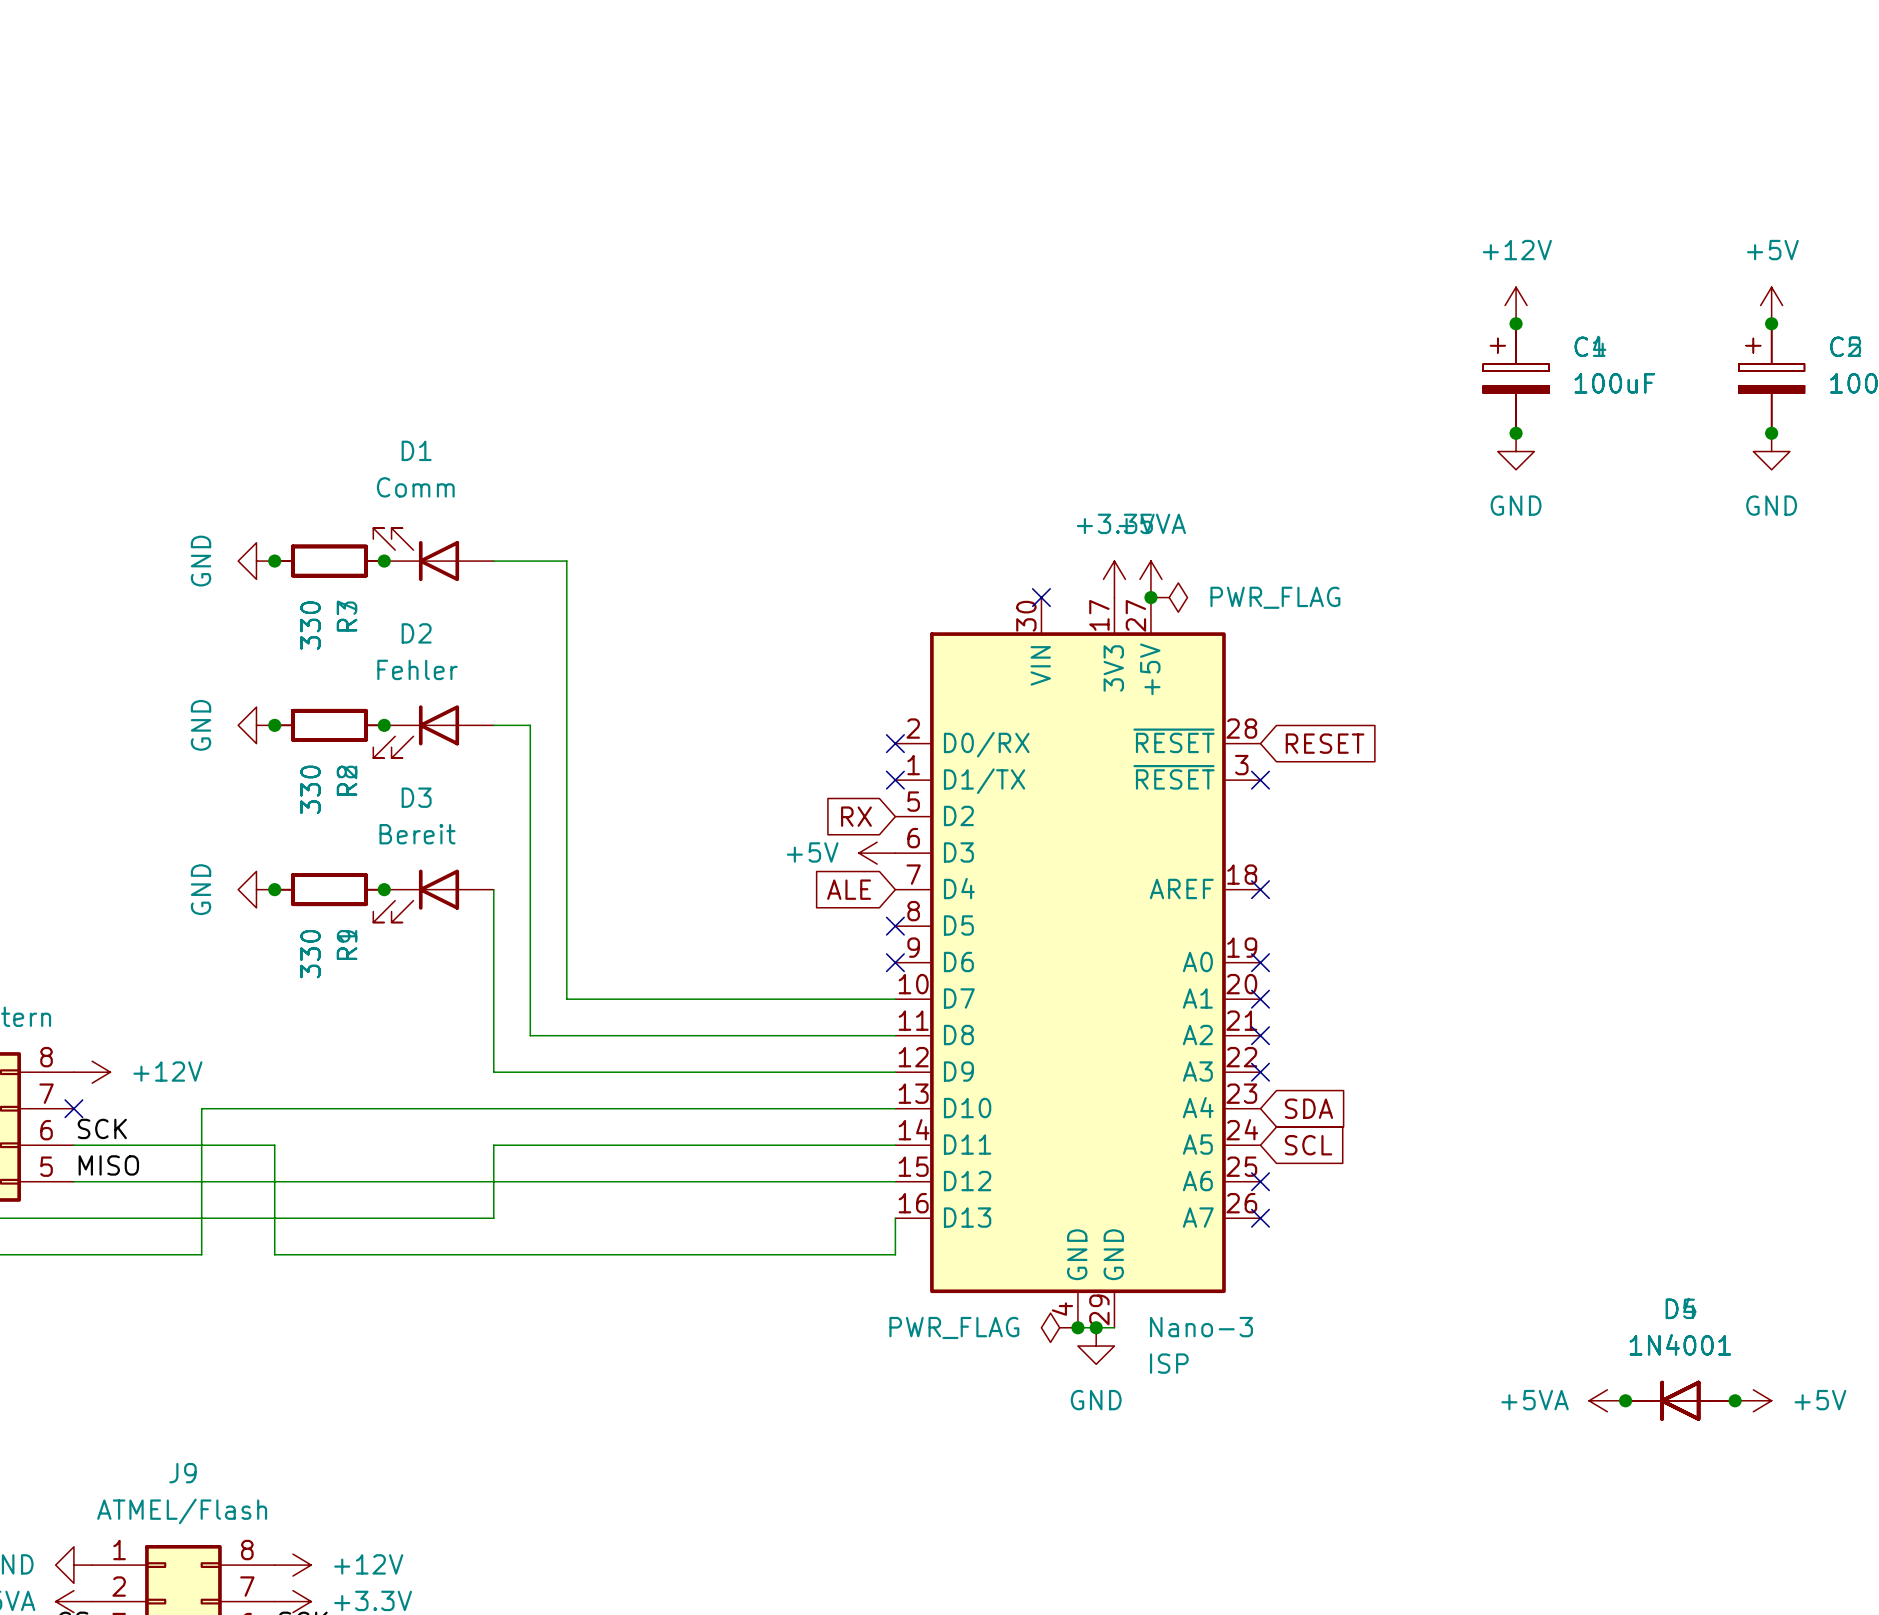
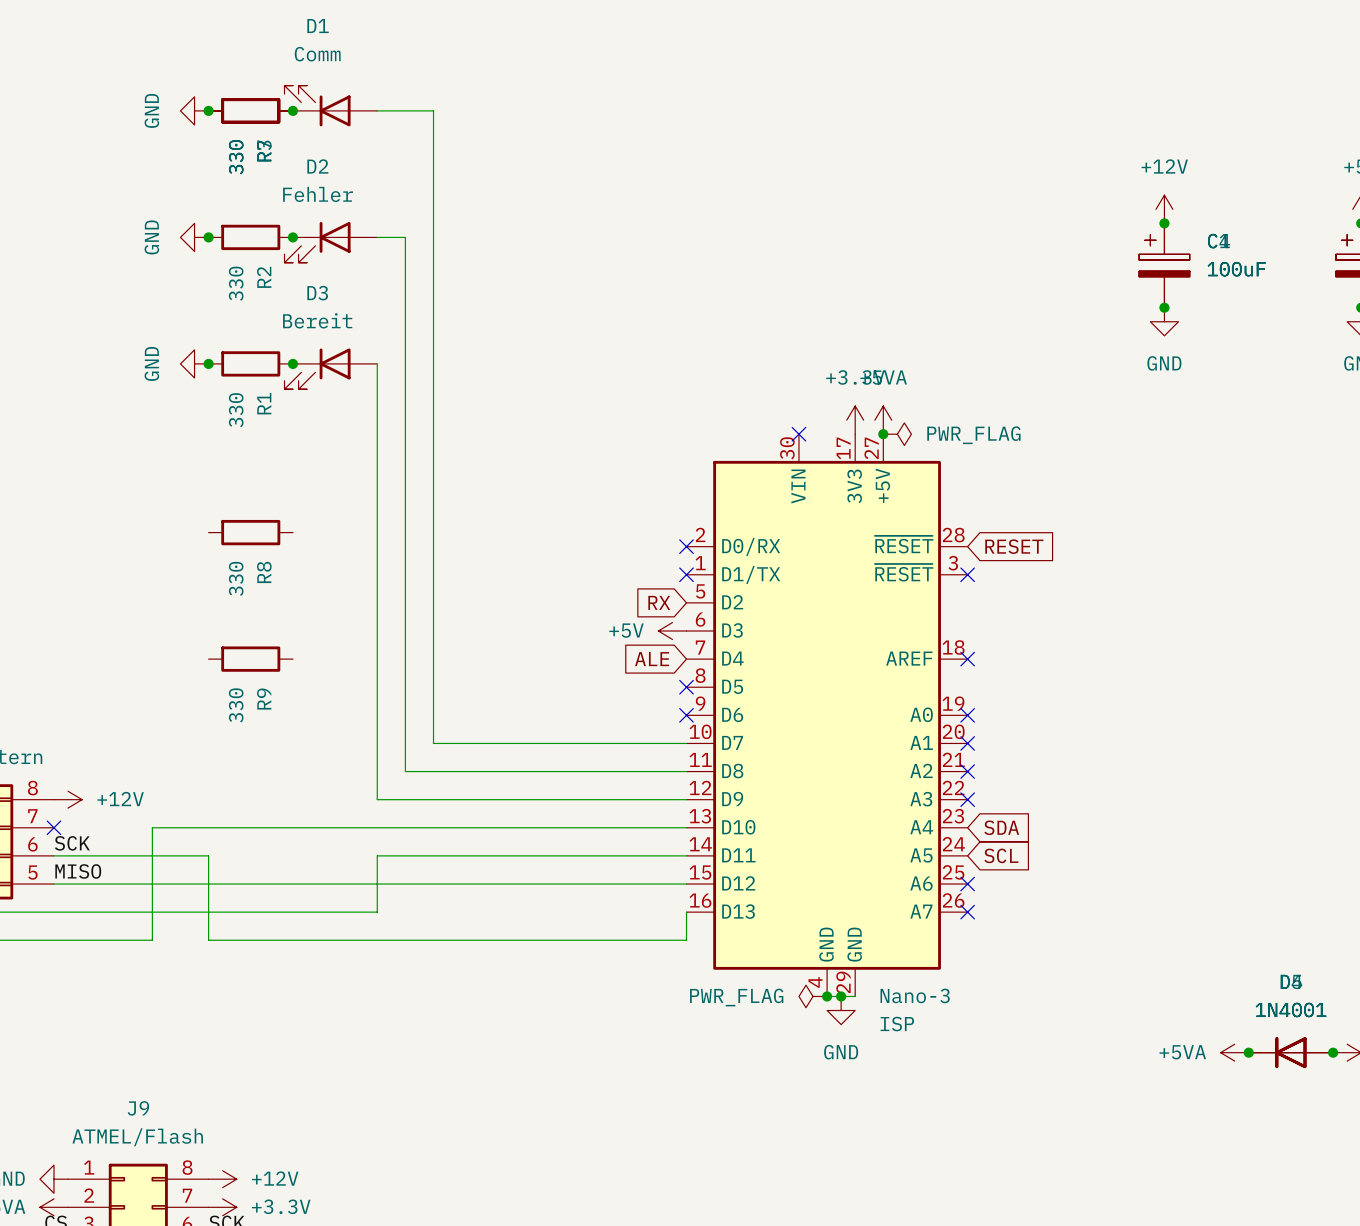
power symbol: none -> GND (194, 110)
junction: none -> (208, 110)
junction: none -> (292, 110)
power symbol: none -> GND (194, 237)
junction: none -> (208, 237)
junction: none -> (292, 237)
wire: none -> (377, 363) (377, 659)
D1 position: (433, 554) -> (330, 105)
power symbol position: GND (256, 561) -> GND (194, 363)
junction position: (274, 561) -> (208, 363)
part position: (329, 561) -> (250, 110)
part position: (329, 561) -> (250, 110)
junction position: (384, 561) -> (292, 363)
wire: (493, 561) (566, 561) -> (377, 110) (433, 110) (433, 406)
power symbol: GND (256, 725) -> none
junction: (274, 725) -> none
R2 position: (329, 725) -> (250, 237)
junction: (384, 725) -> none
wire: (493, 725) (530, 725) -> (377, 237) (405, 237) (405, 532)
D2 position: (433, 731) -> (330, 242)
power symbol: GND (256, 889) -> none
junction: (274, 889) -> none
R1 position: (329, 889) -> (250, 363)
junction: (384, 889) -> none
D3 position: (433, 896) -> (330, 368)

